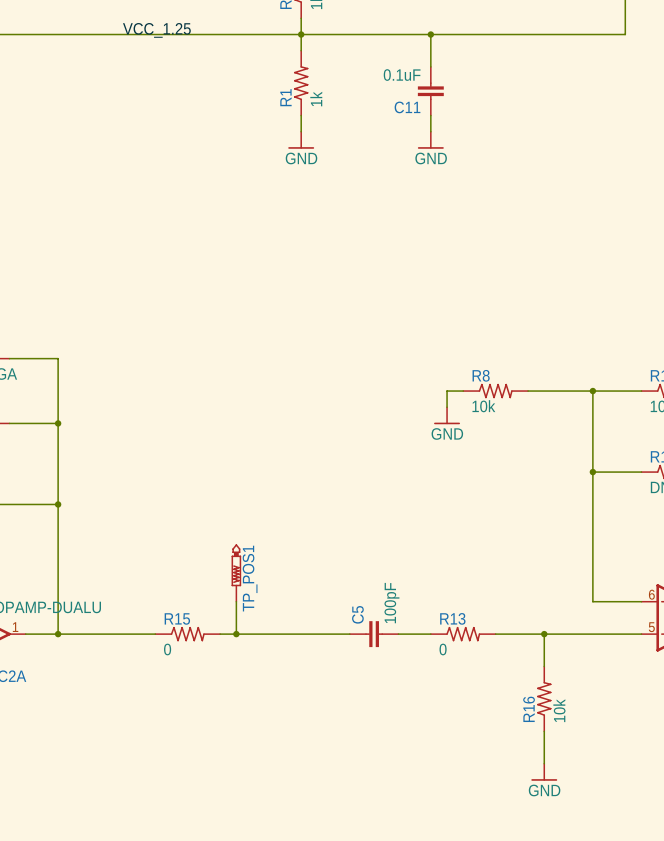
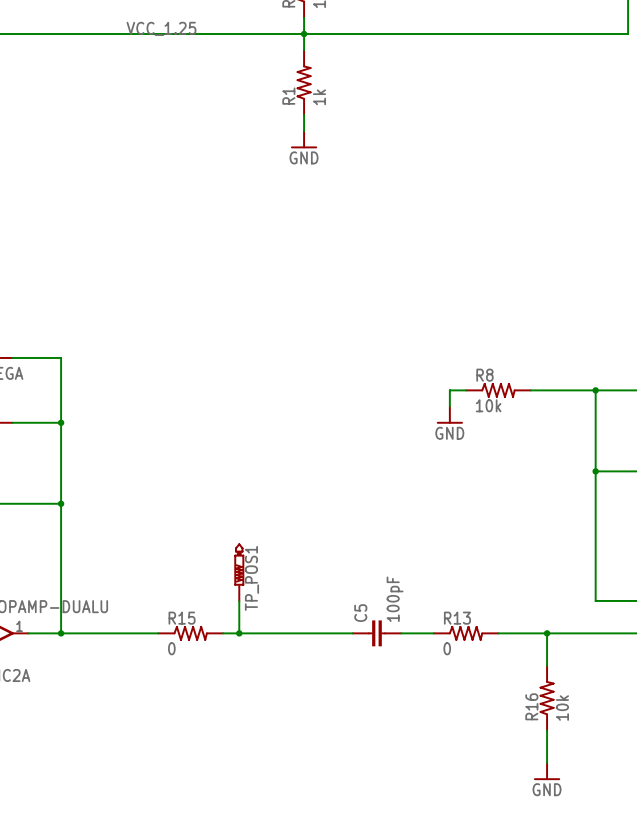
wire: (430, 34) (430, 66) -> none
junction: (430, 34) -> none
C11: 0.1uF (430, 91) -> none
wire: (430, 115) (430, 131) -> none
power symbol: GND (430, 140) -> none

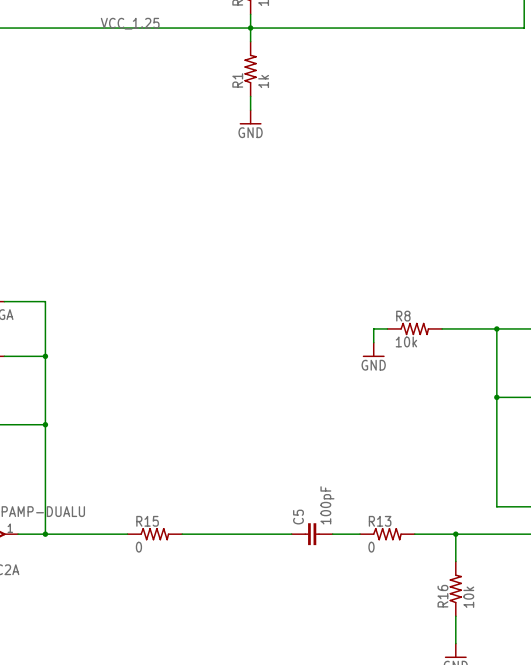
TP_POS1: (239, 572) -> none
wire: (239, 600) (239, 633) -> none
junction: (239, 633) -> none

